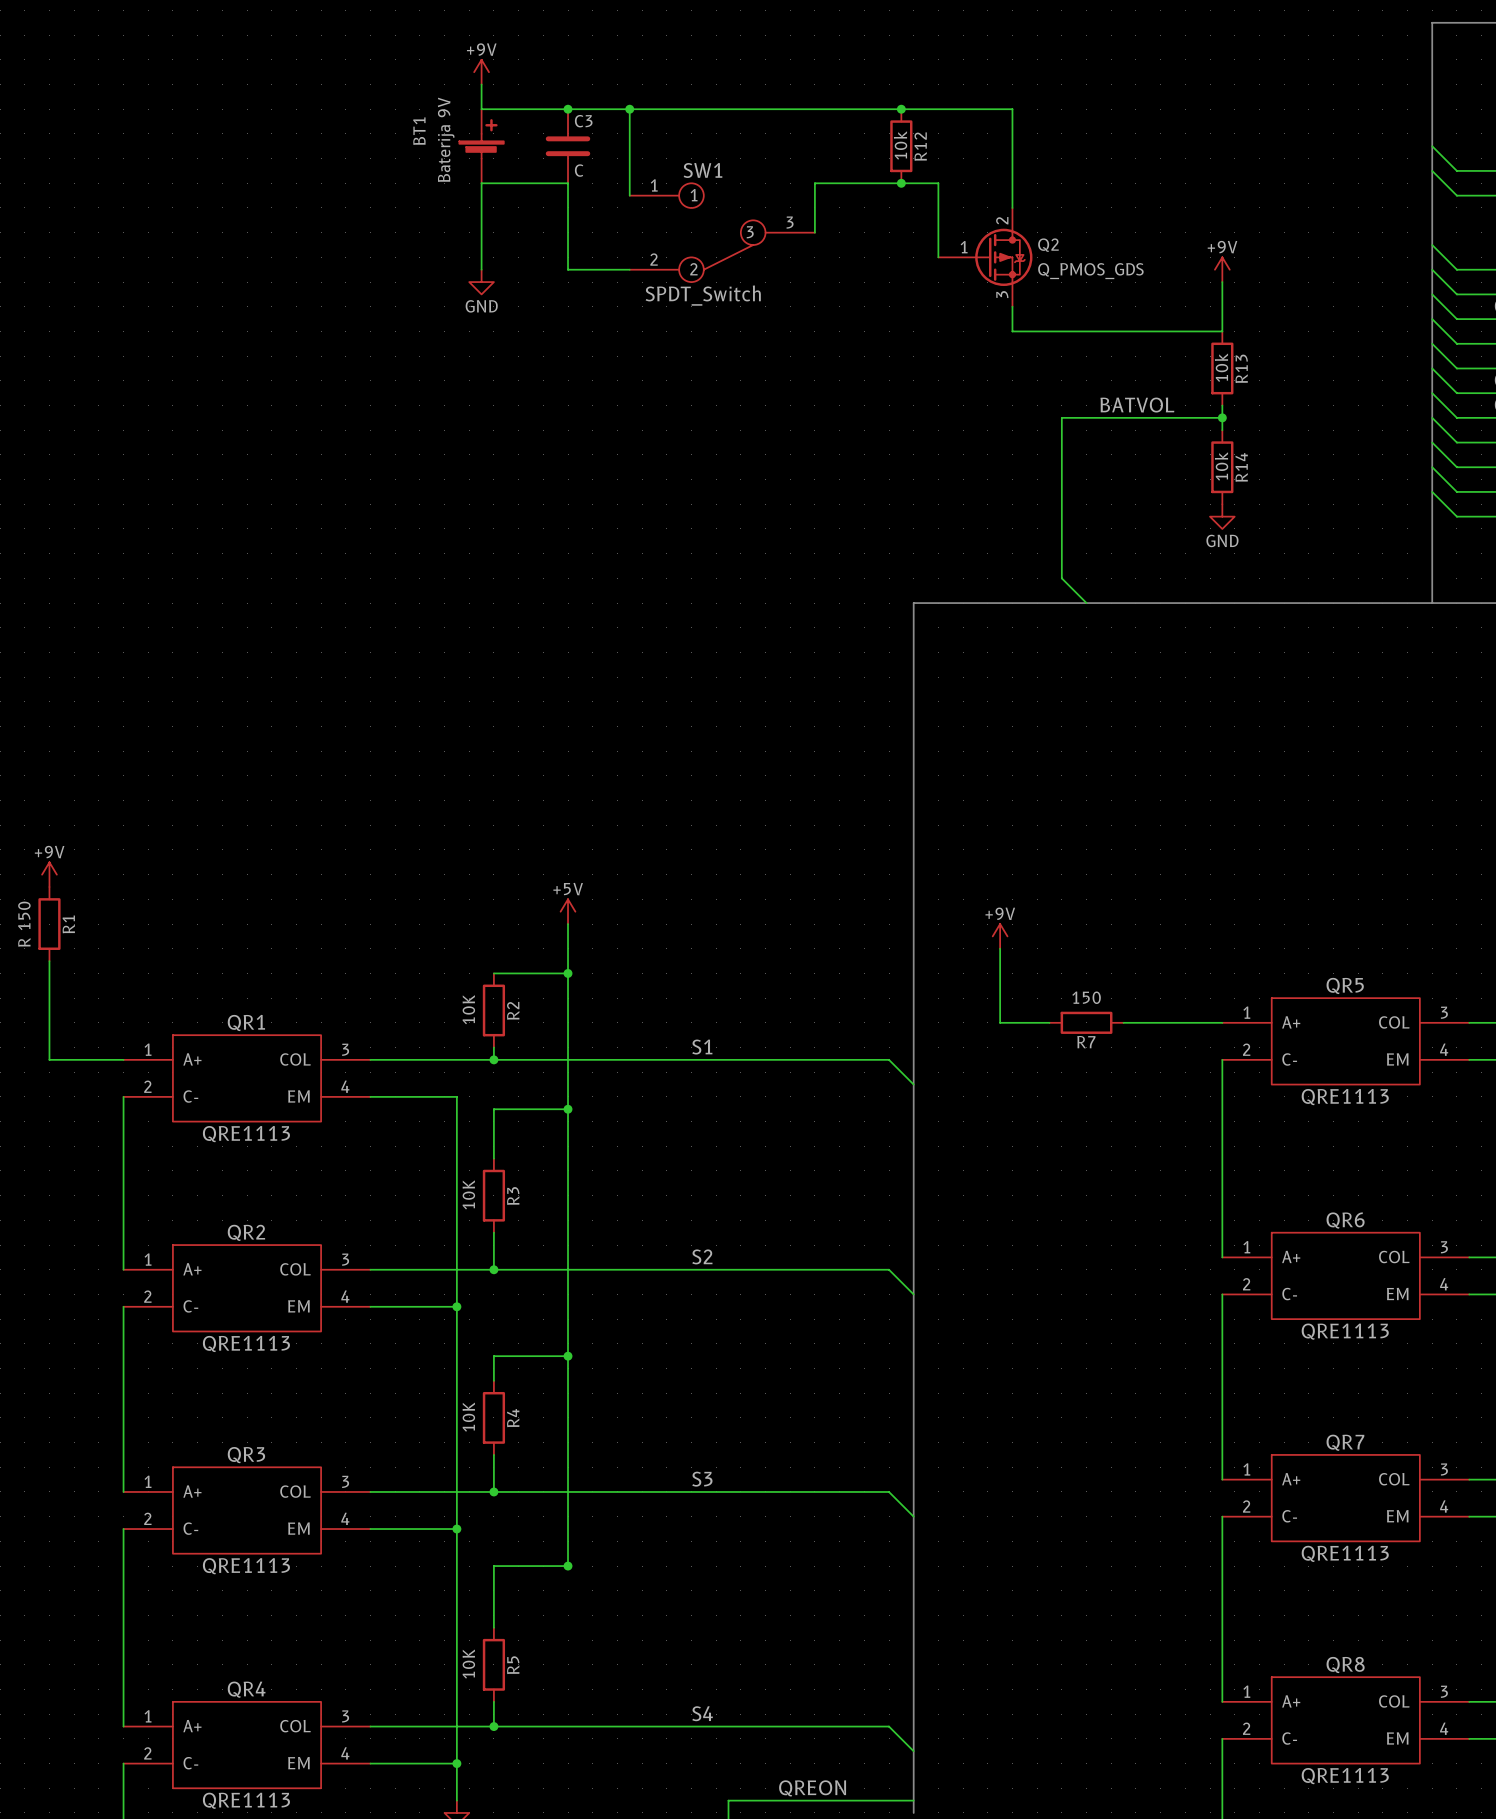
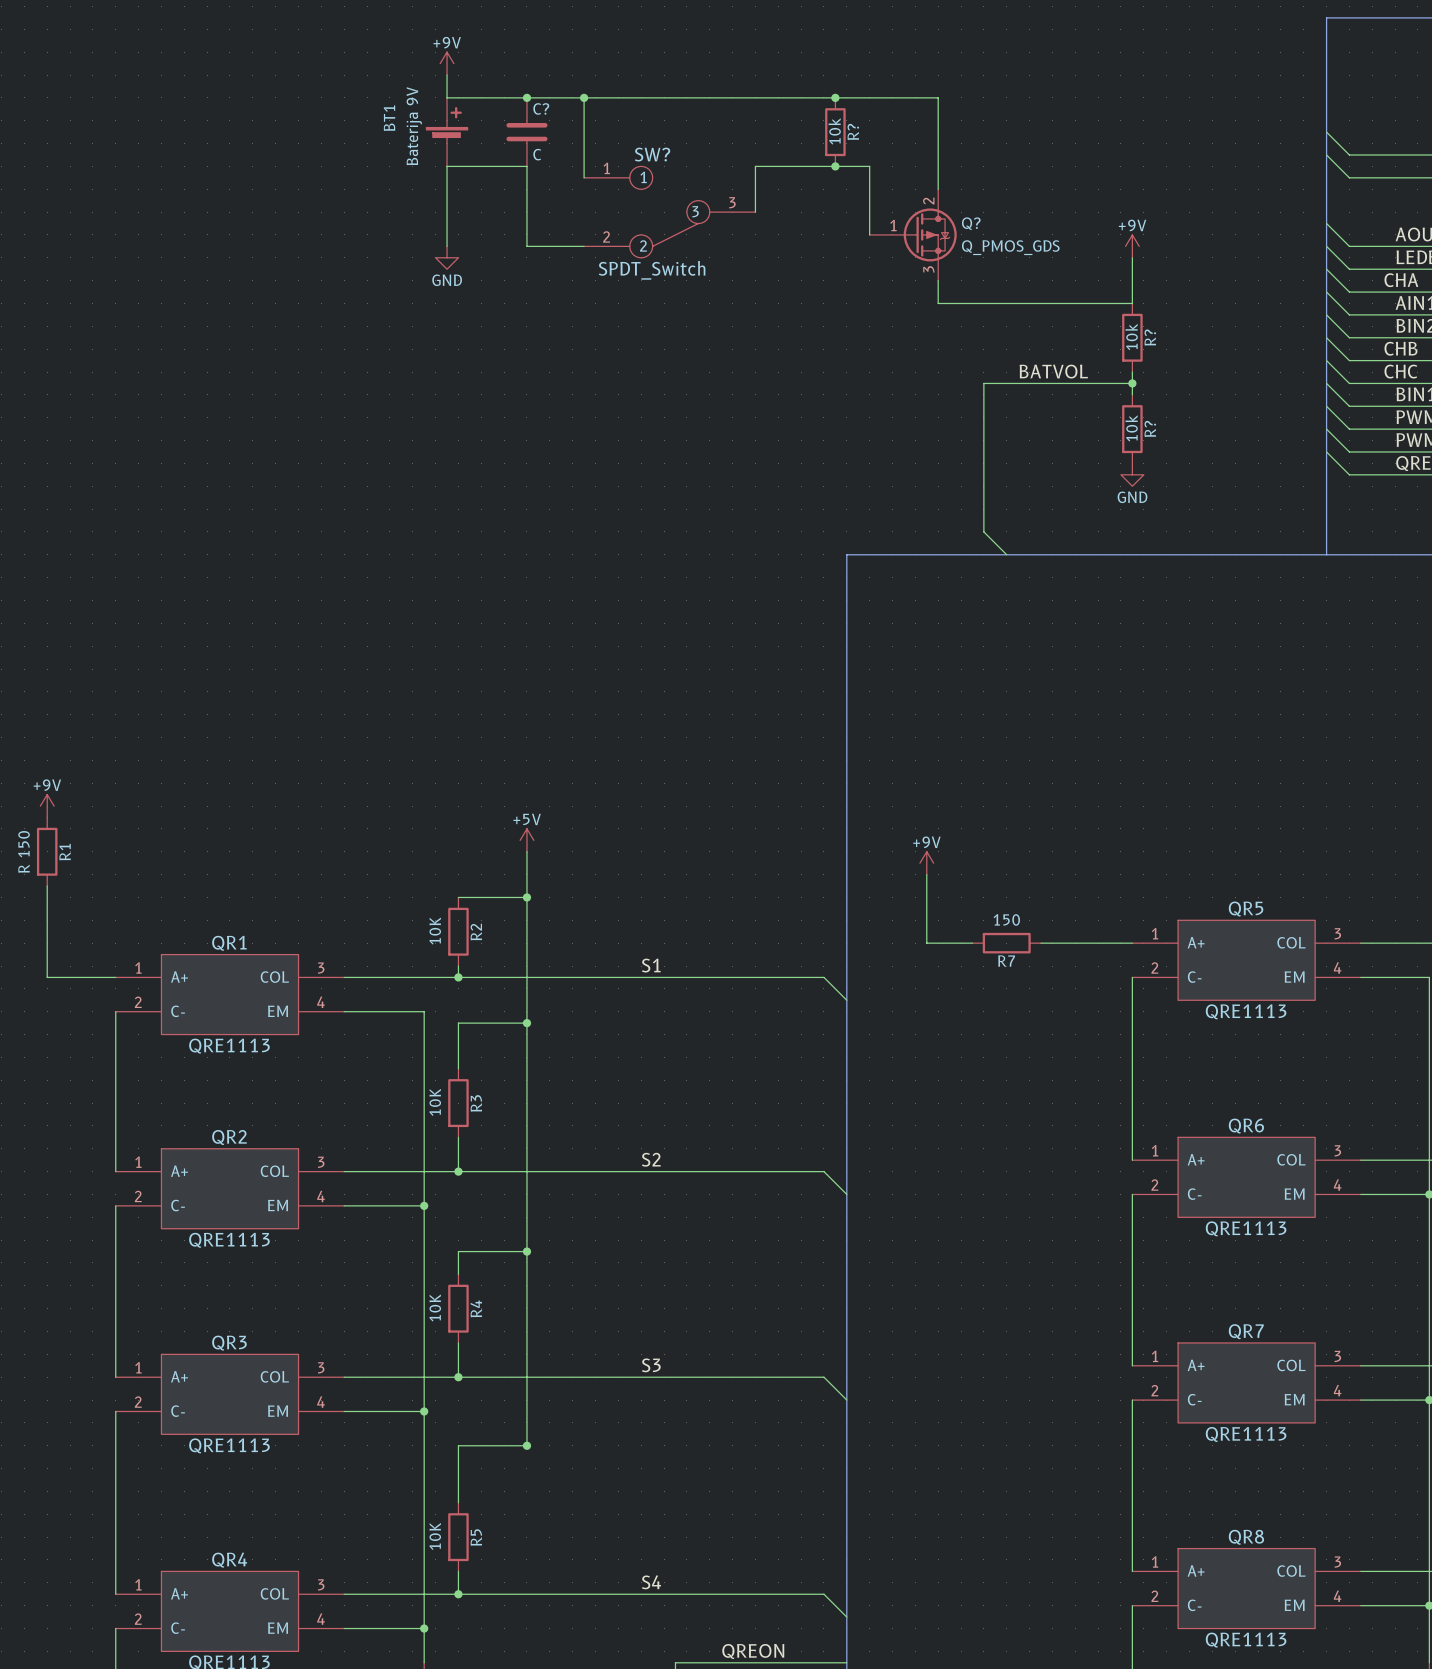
C3 name: C3 (583, 121) -> C? (541, 108)
R12 name: R12 (920, 146) -> R? (853, 131)
SW1 name: SW1 (702, 170) -> SW? (652, 154)
Q2 name: Q2 (1048, 245) -> Q? (971, 223)
R13 name: R13 (1241, 368) -> R? (1150, 337)
R14 name: R14 (1241, 467) -> R? (1150, 428)

